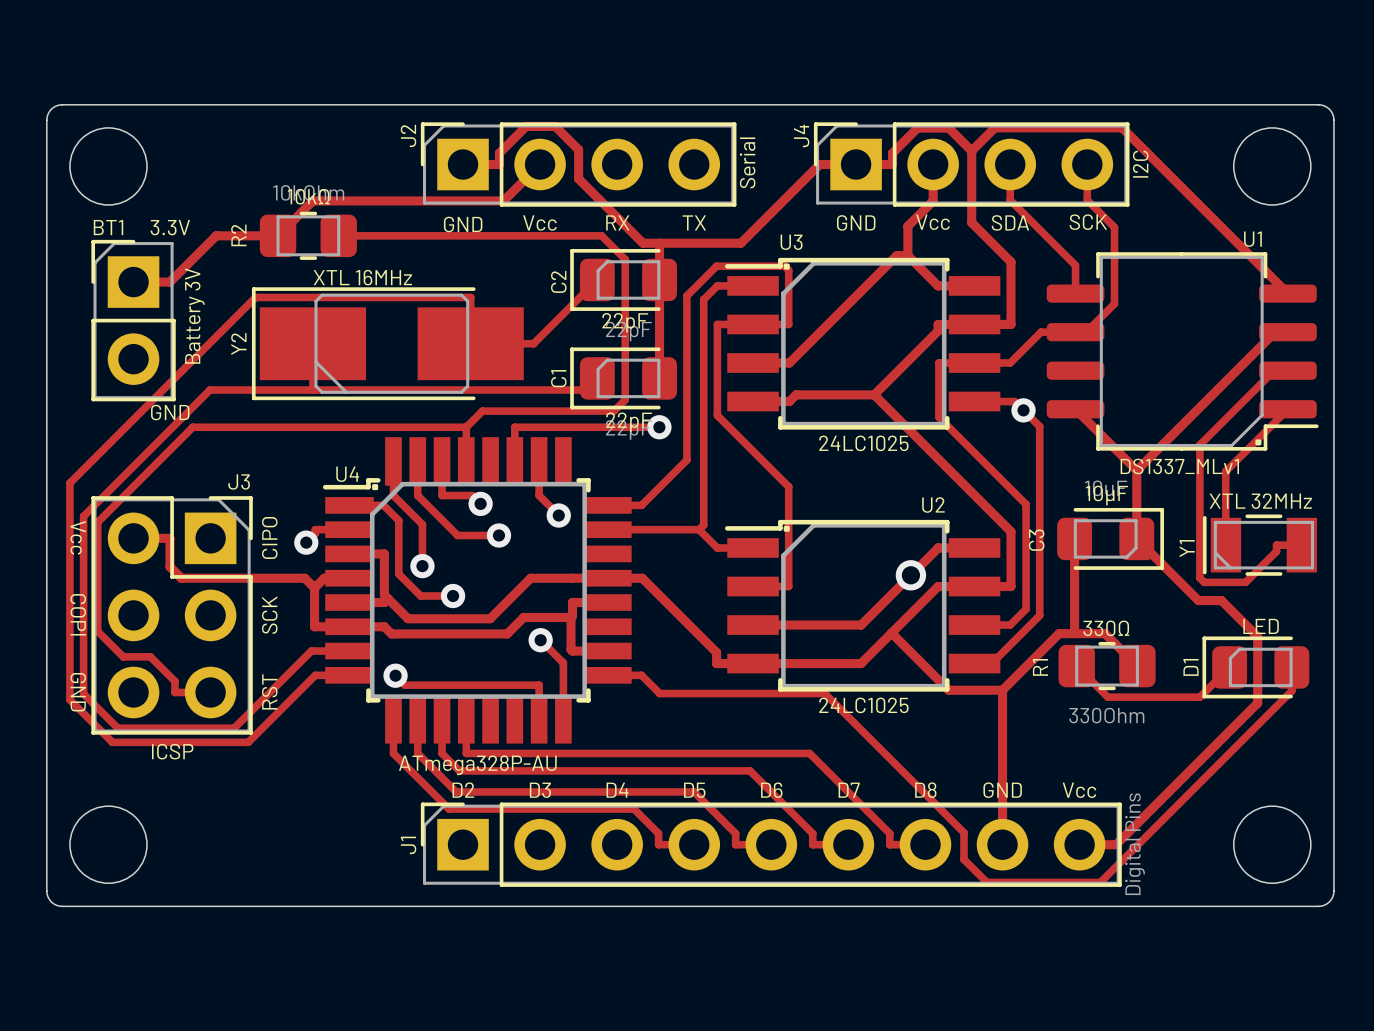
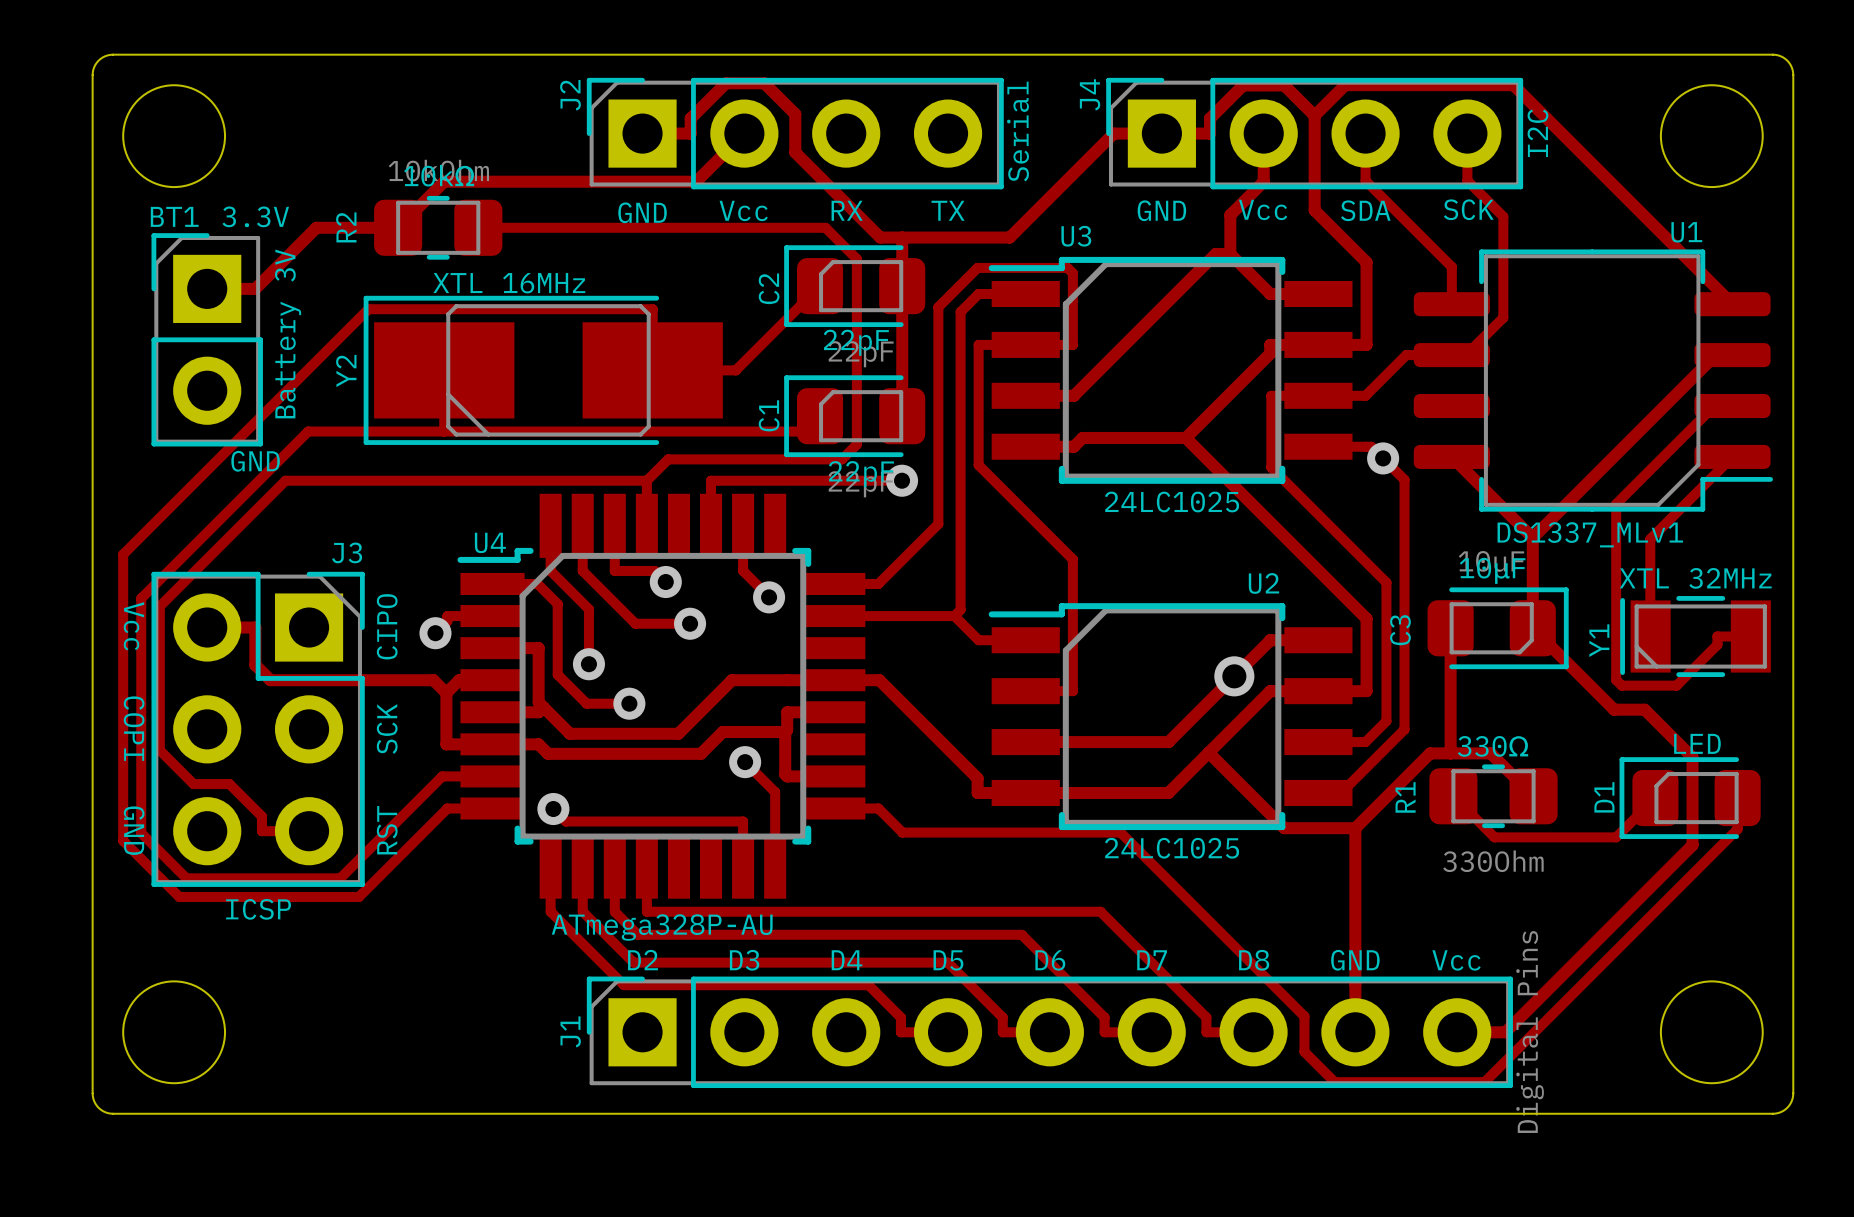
drawing: [783, 263, 790, 270] -> none
drawing: [1255, 439, 1262, 446] -> none
drawing: [372, 484, 379, 491] -> none
drawing: [783, 525, 790, 532] -> none

